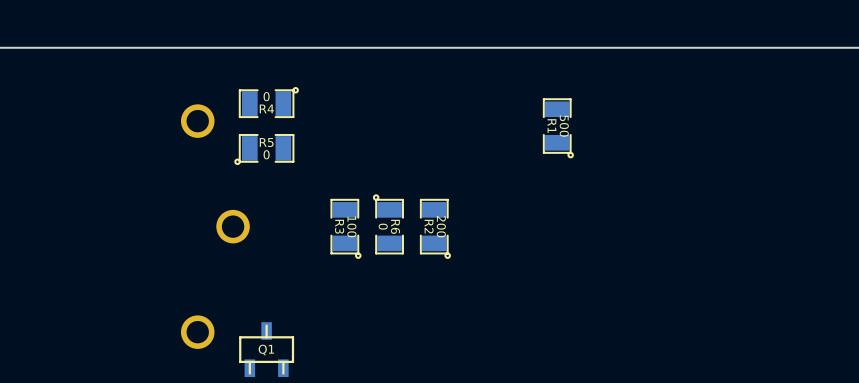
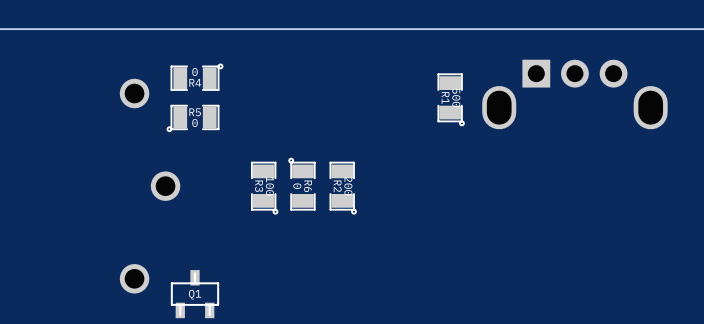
part: none -> (574, 94)

